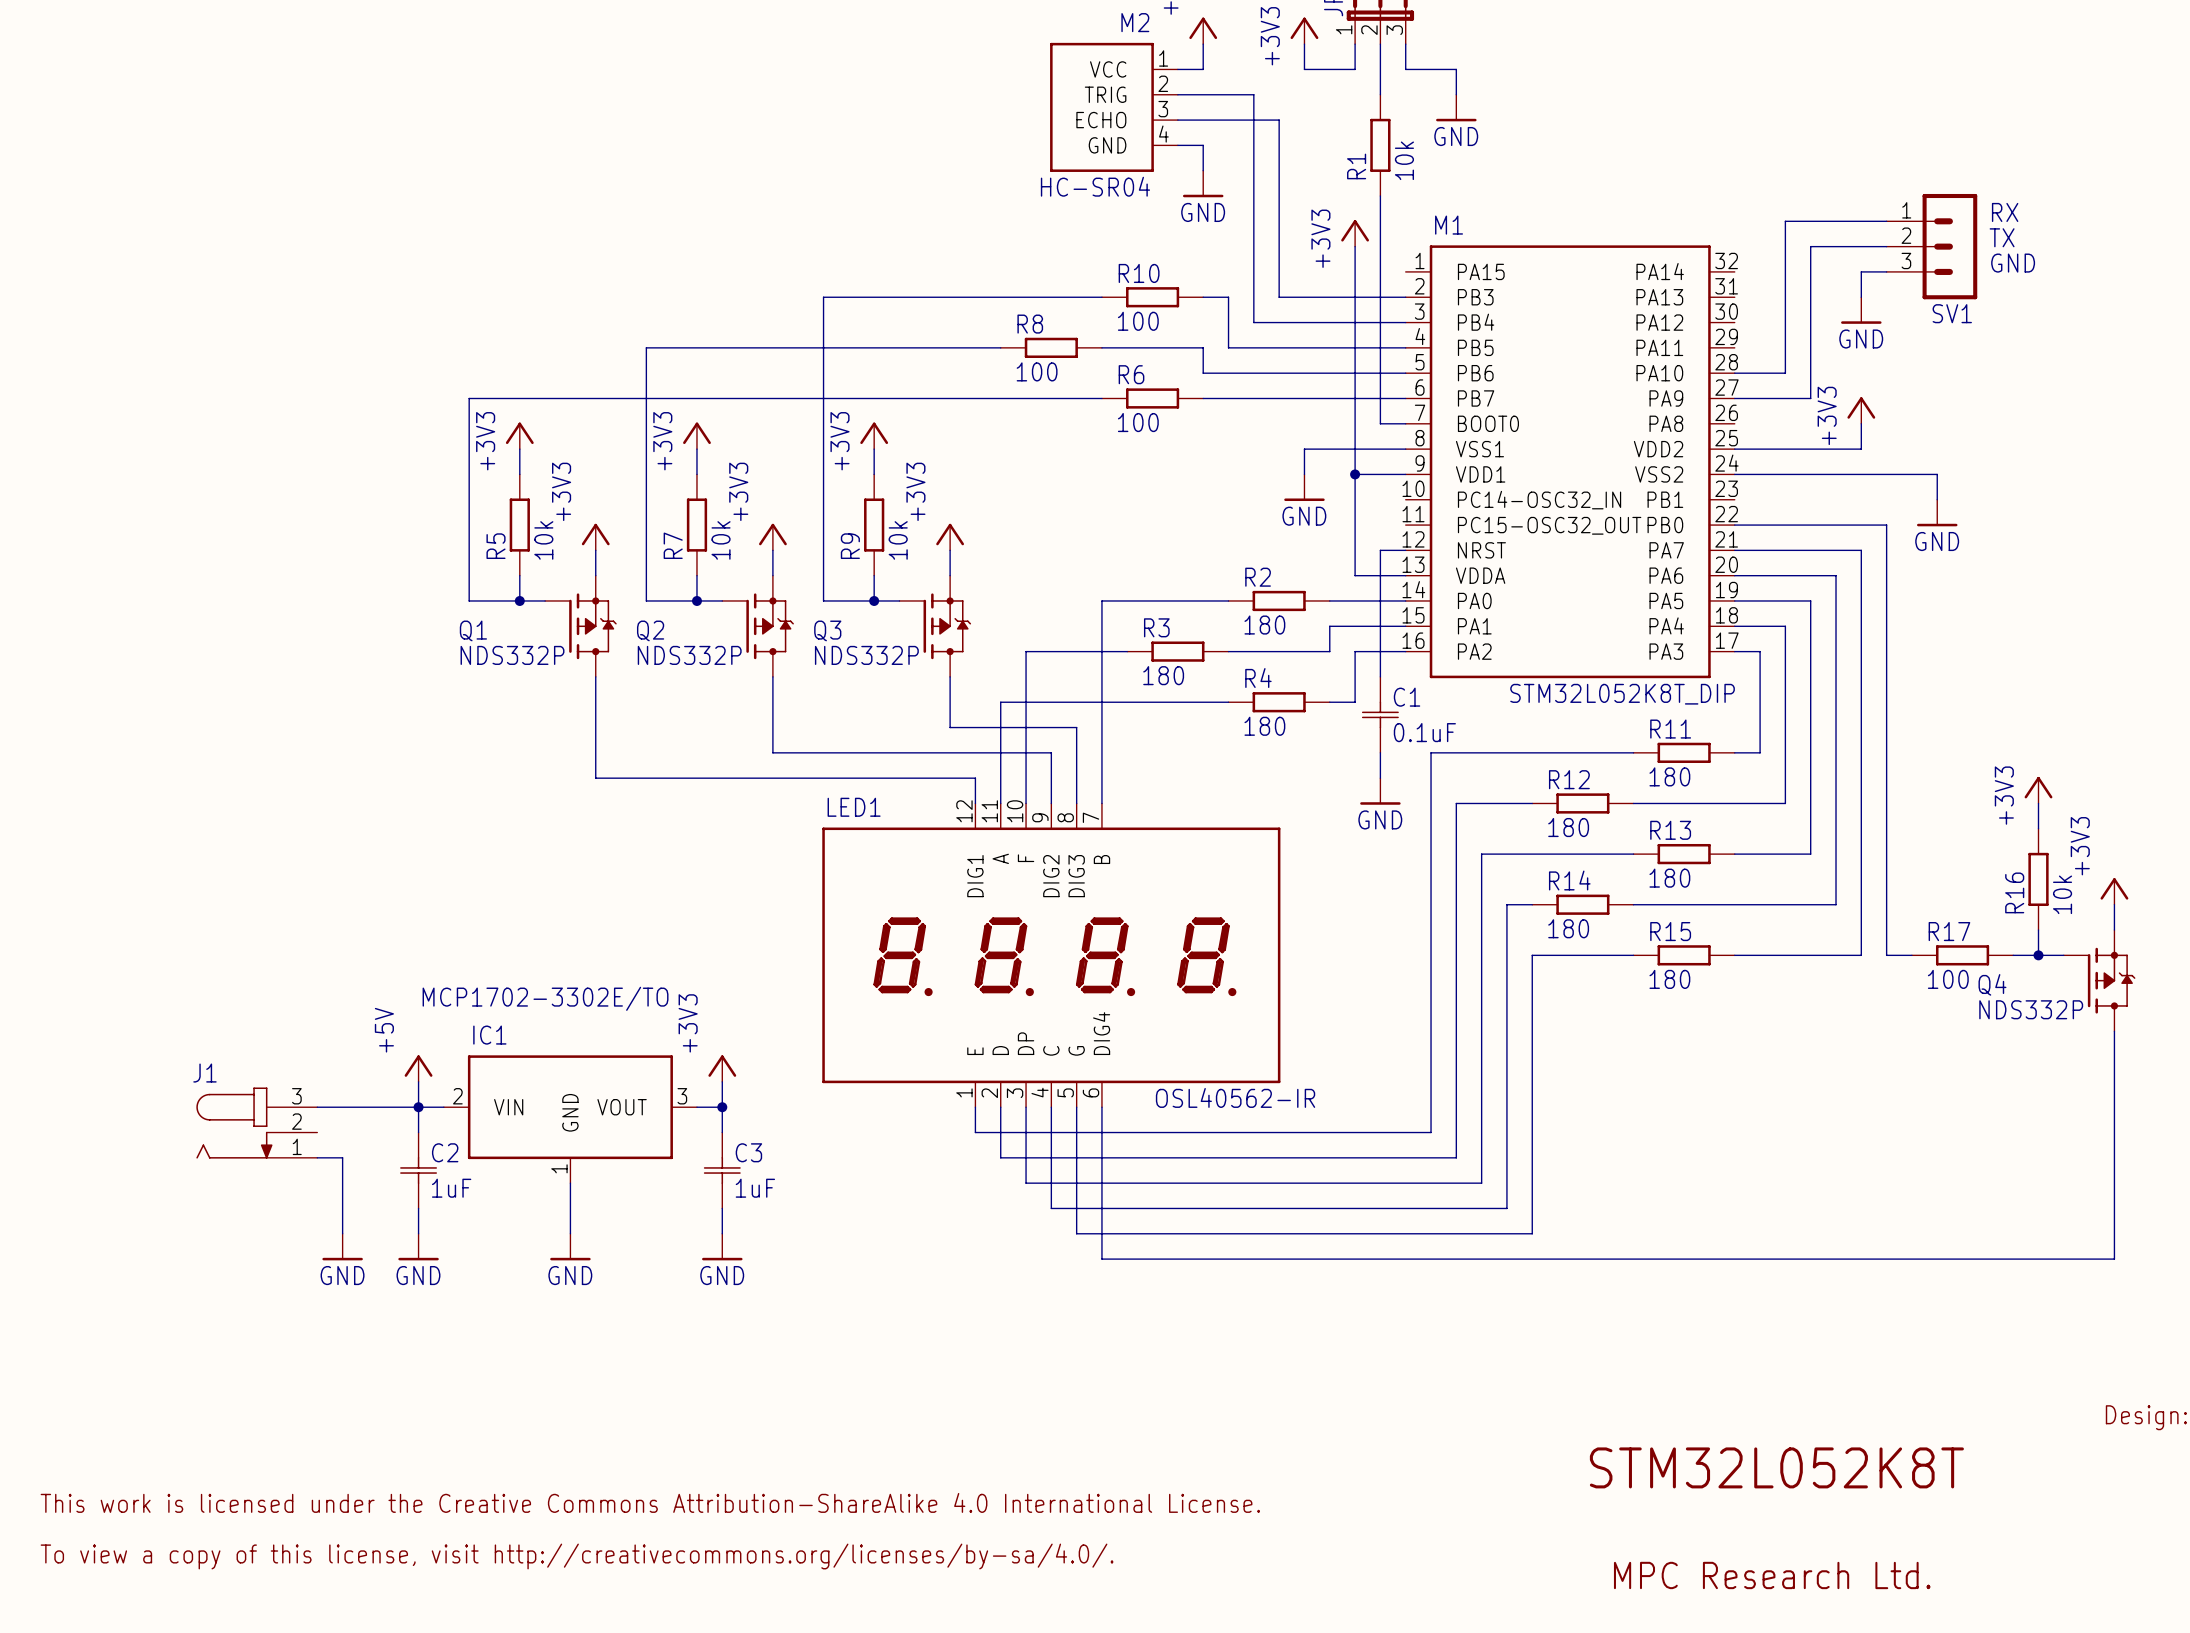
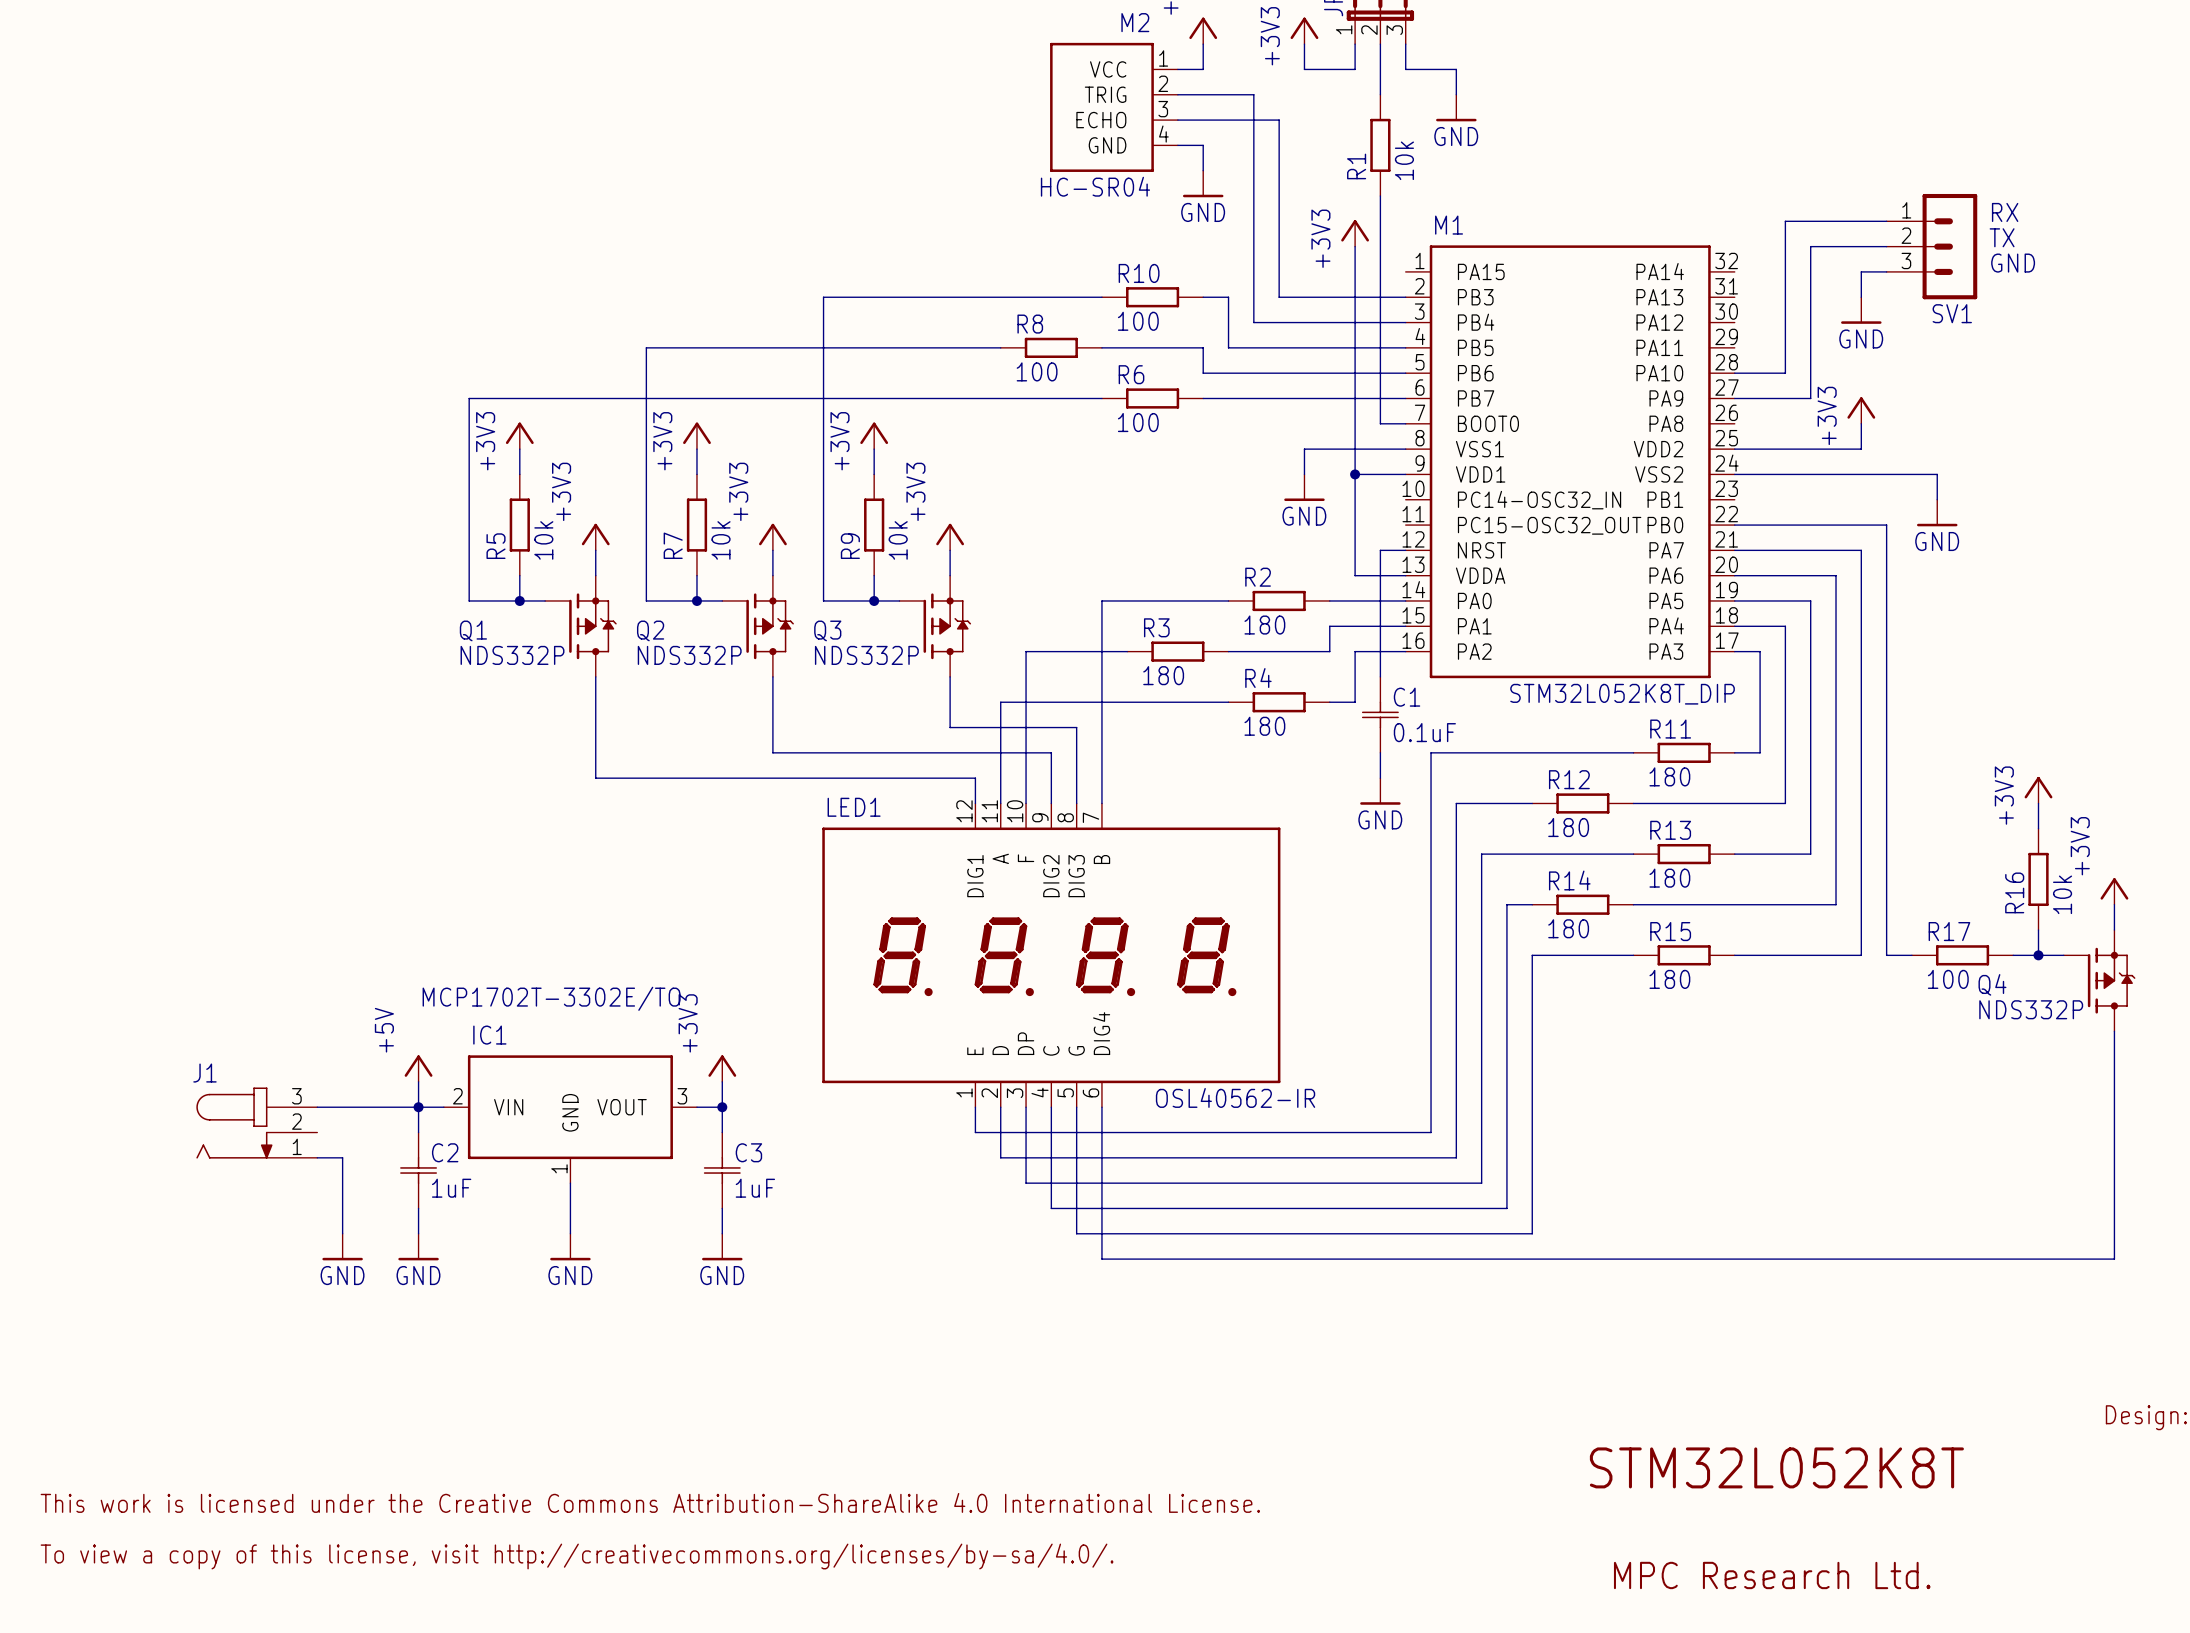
IC1 value: MCP1702-3302E/TO (545, 998) -> MCP1702T-3302E/TO (551, 998)

